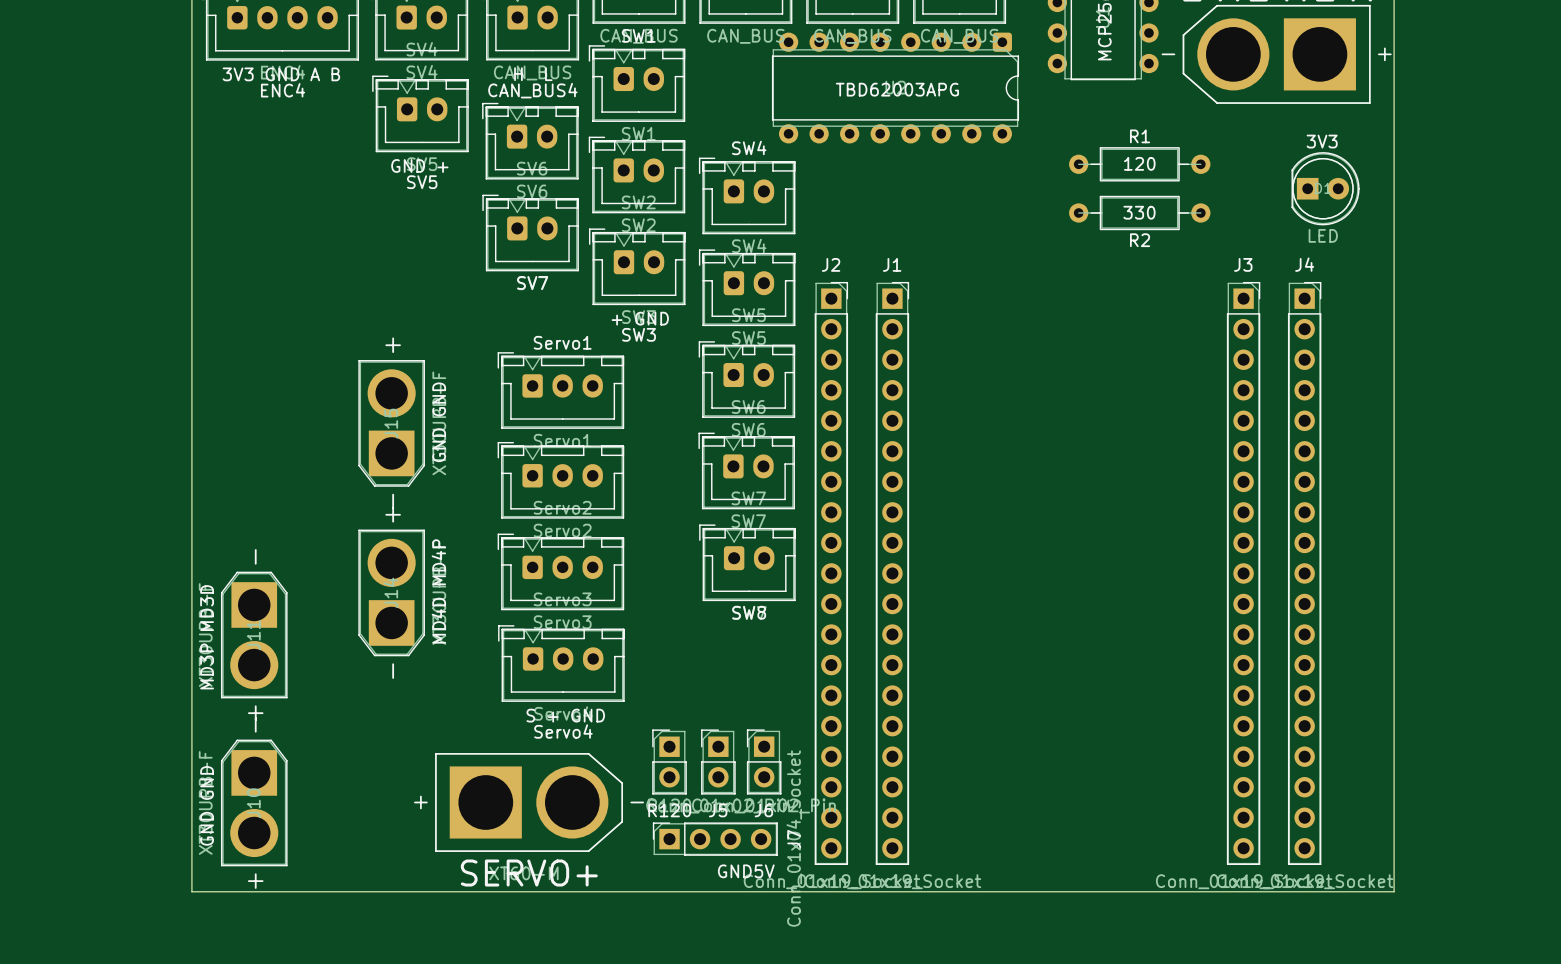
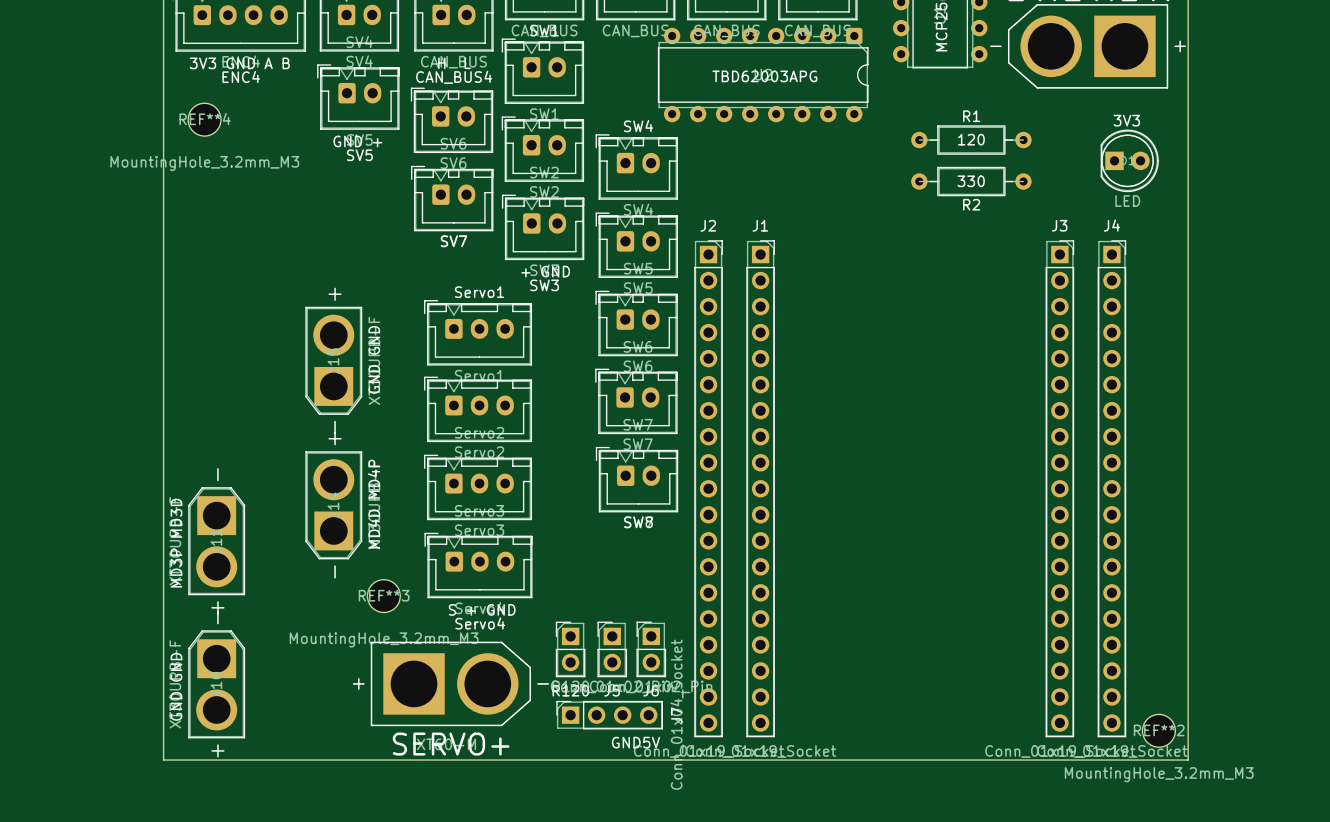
REF**4: none -> MountingHole_3.2mm_M3 (204, 119)
REF**3: none -> MountingHole_3.2mm_M3 (383, 596)
REF**2: none -> MountingHole_3.2mm_M3 (1158, 730)

